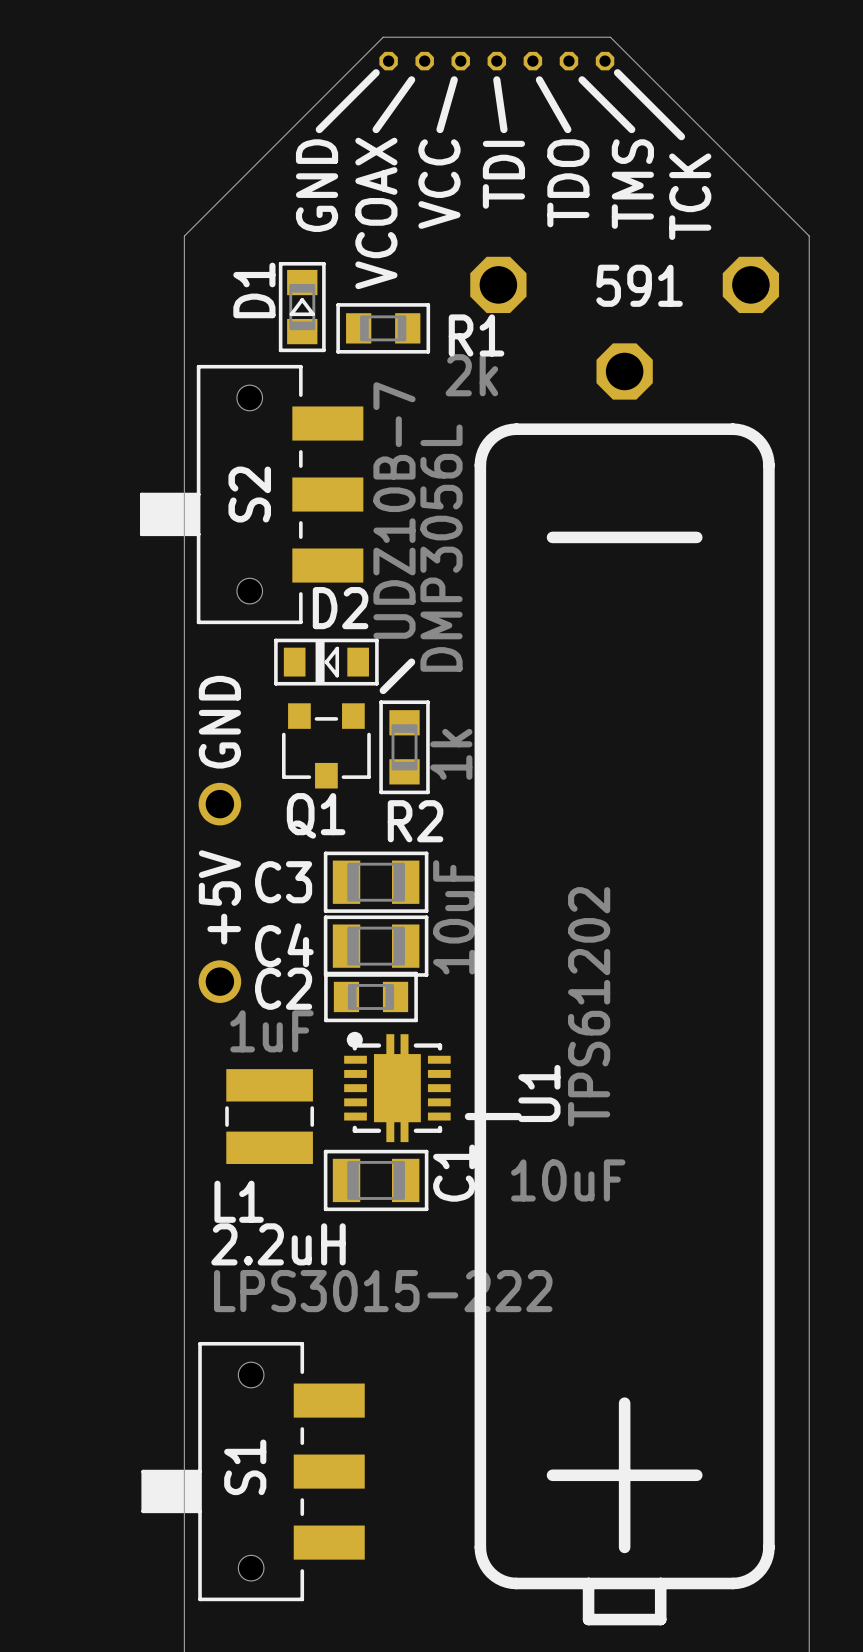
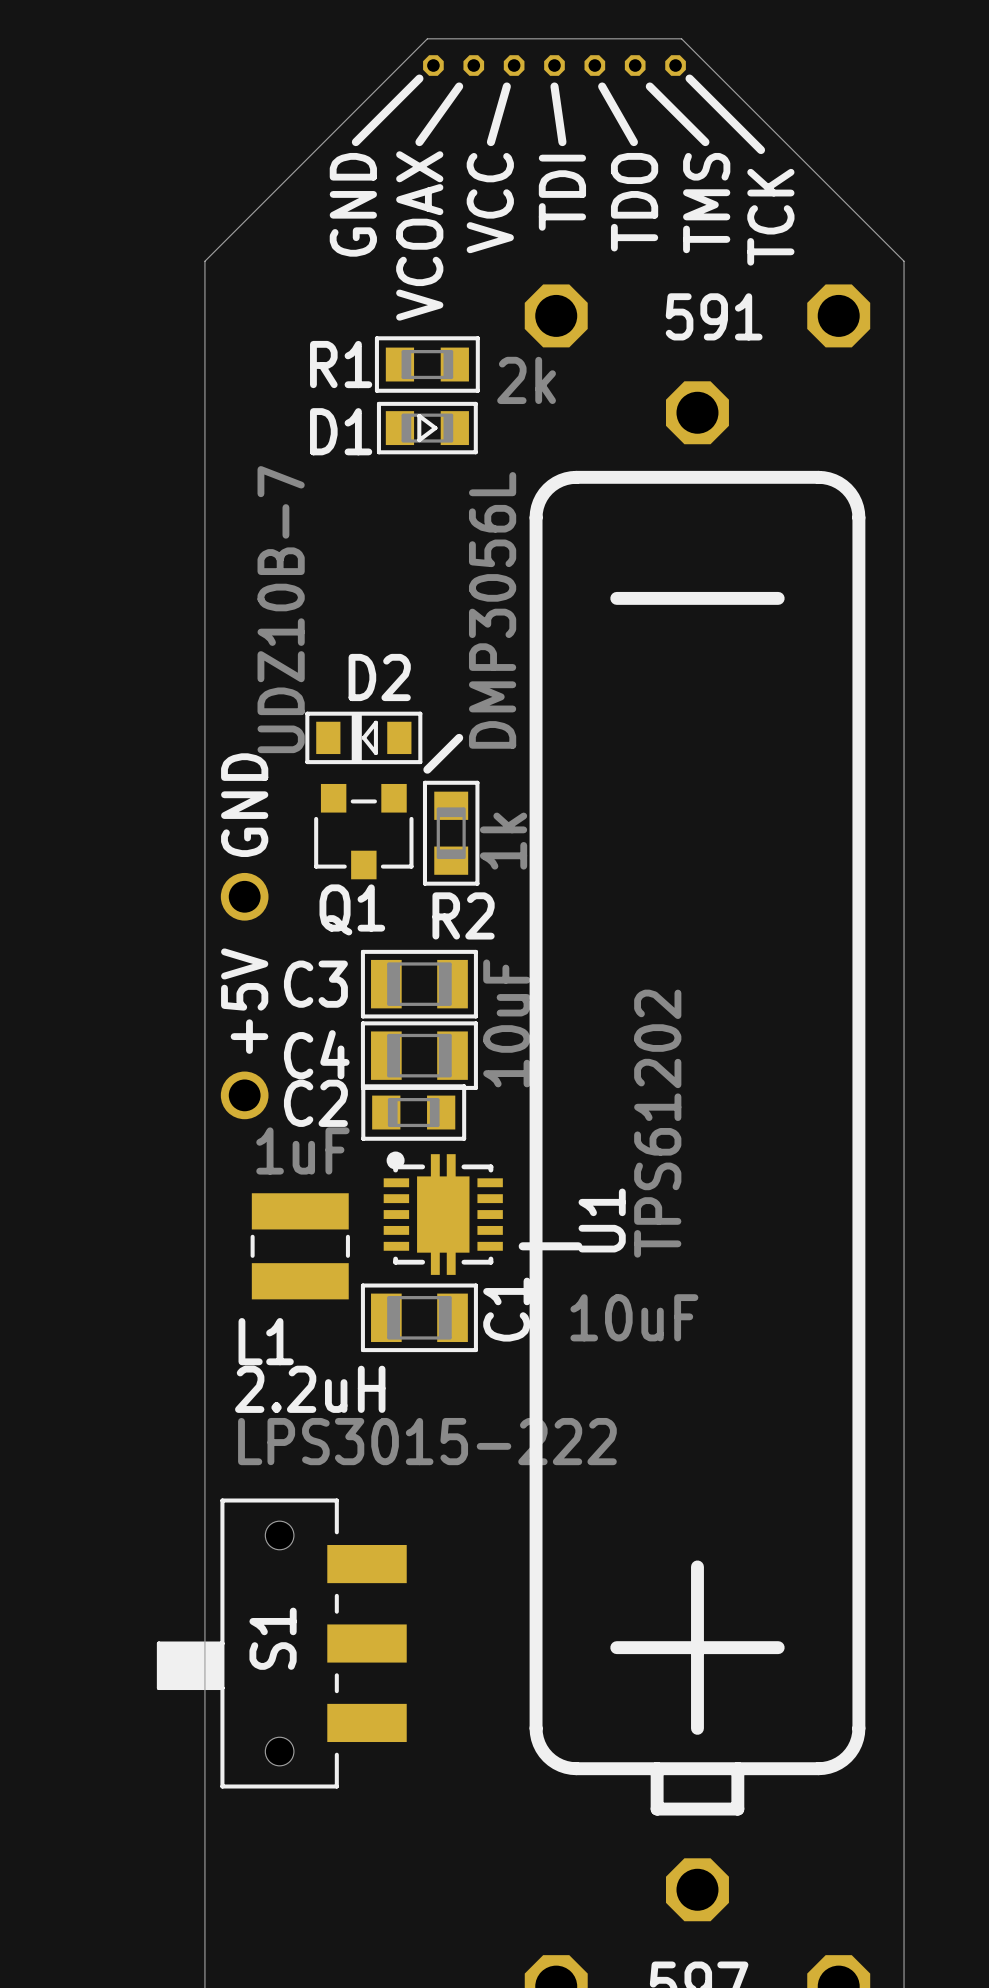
D1 rotation: 0° (302, 307) -> 90° clockwise (427, 428)
D1 position: (302, 307) -> (427, 428)
R1 name position: R1 (476, 335) -> R1 (341, 364)
R1 value position: 2k (471, 375) -> 2k (526, 380)
S2: (251, 494) -> none
D2 value position: UDZ10B-7 (394, 510) -> UDZ10B-7 (281, 609)

